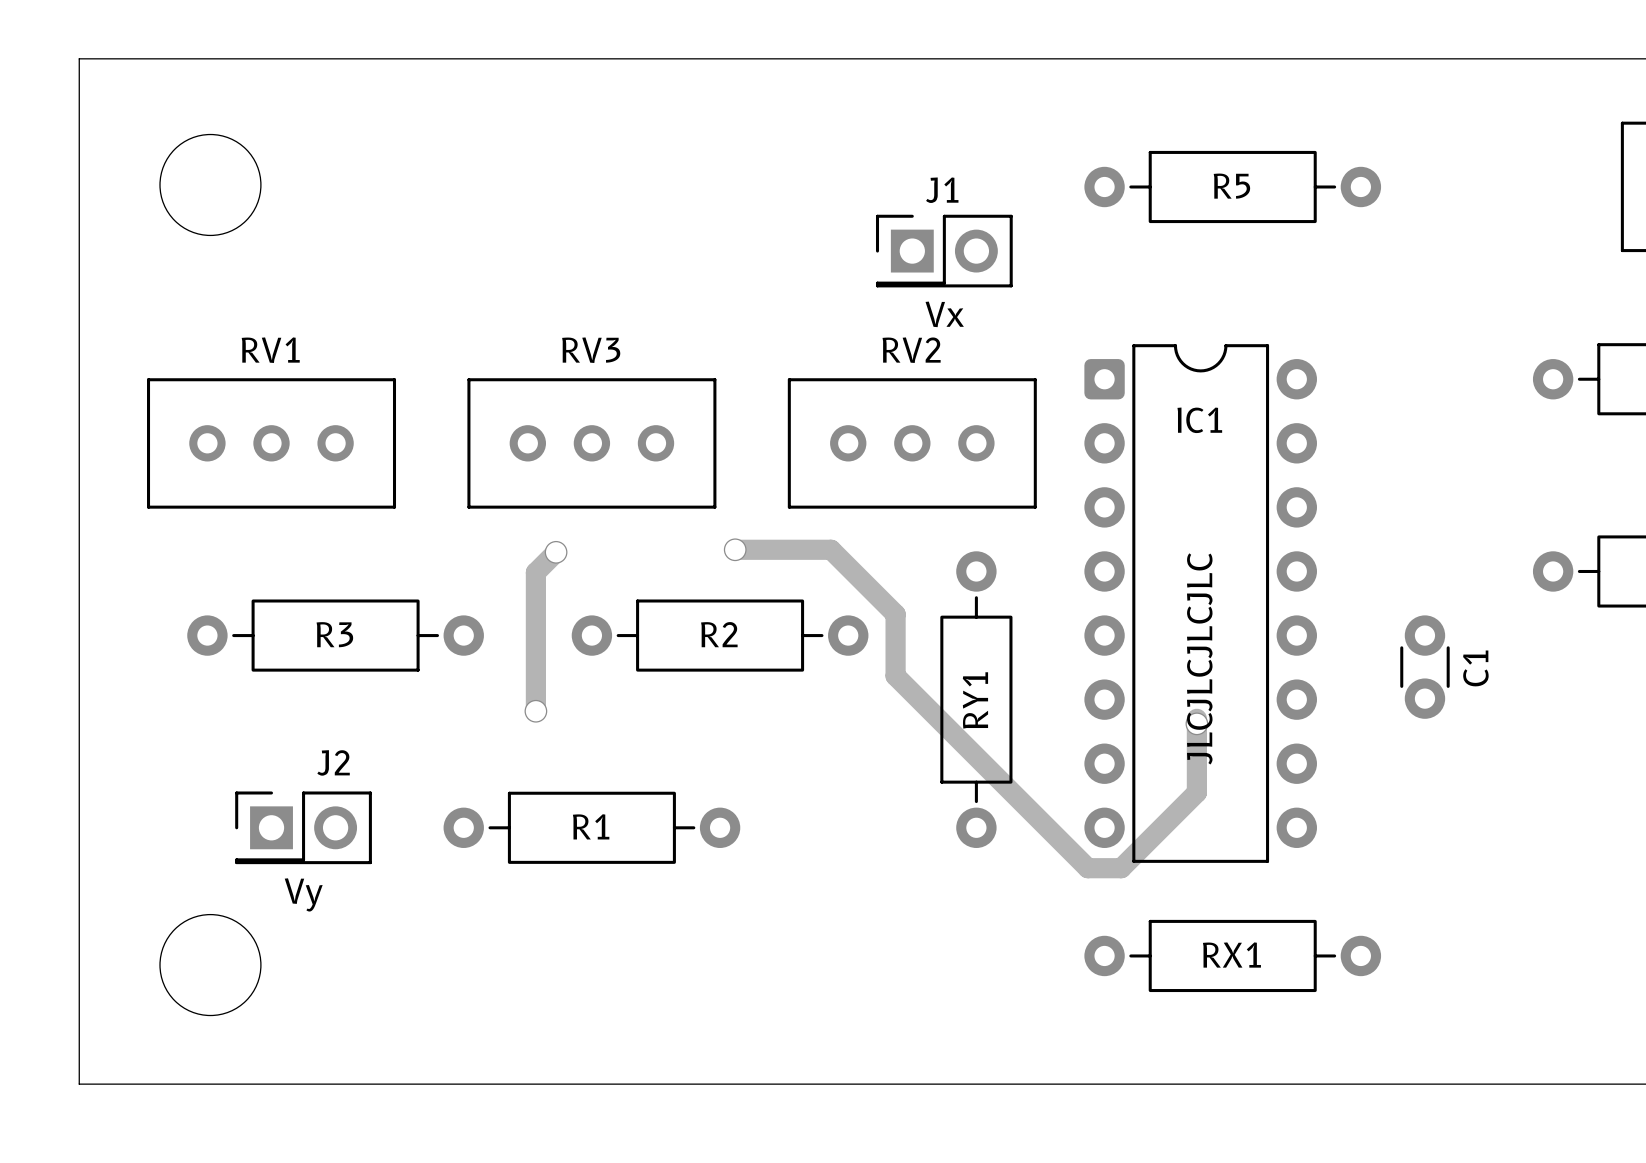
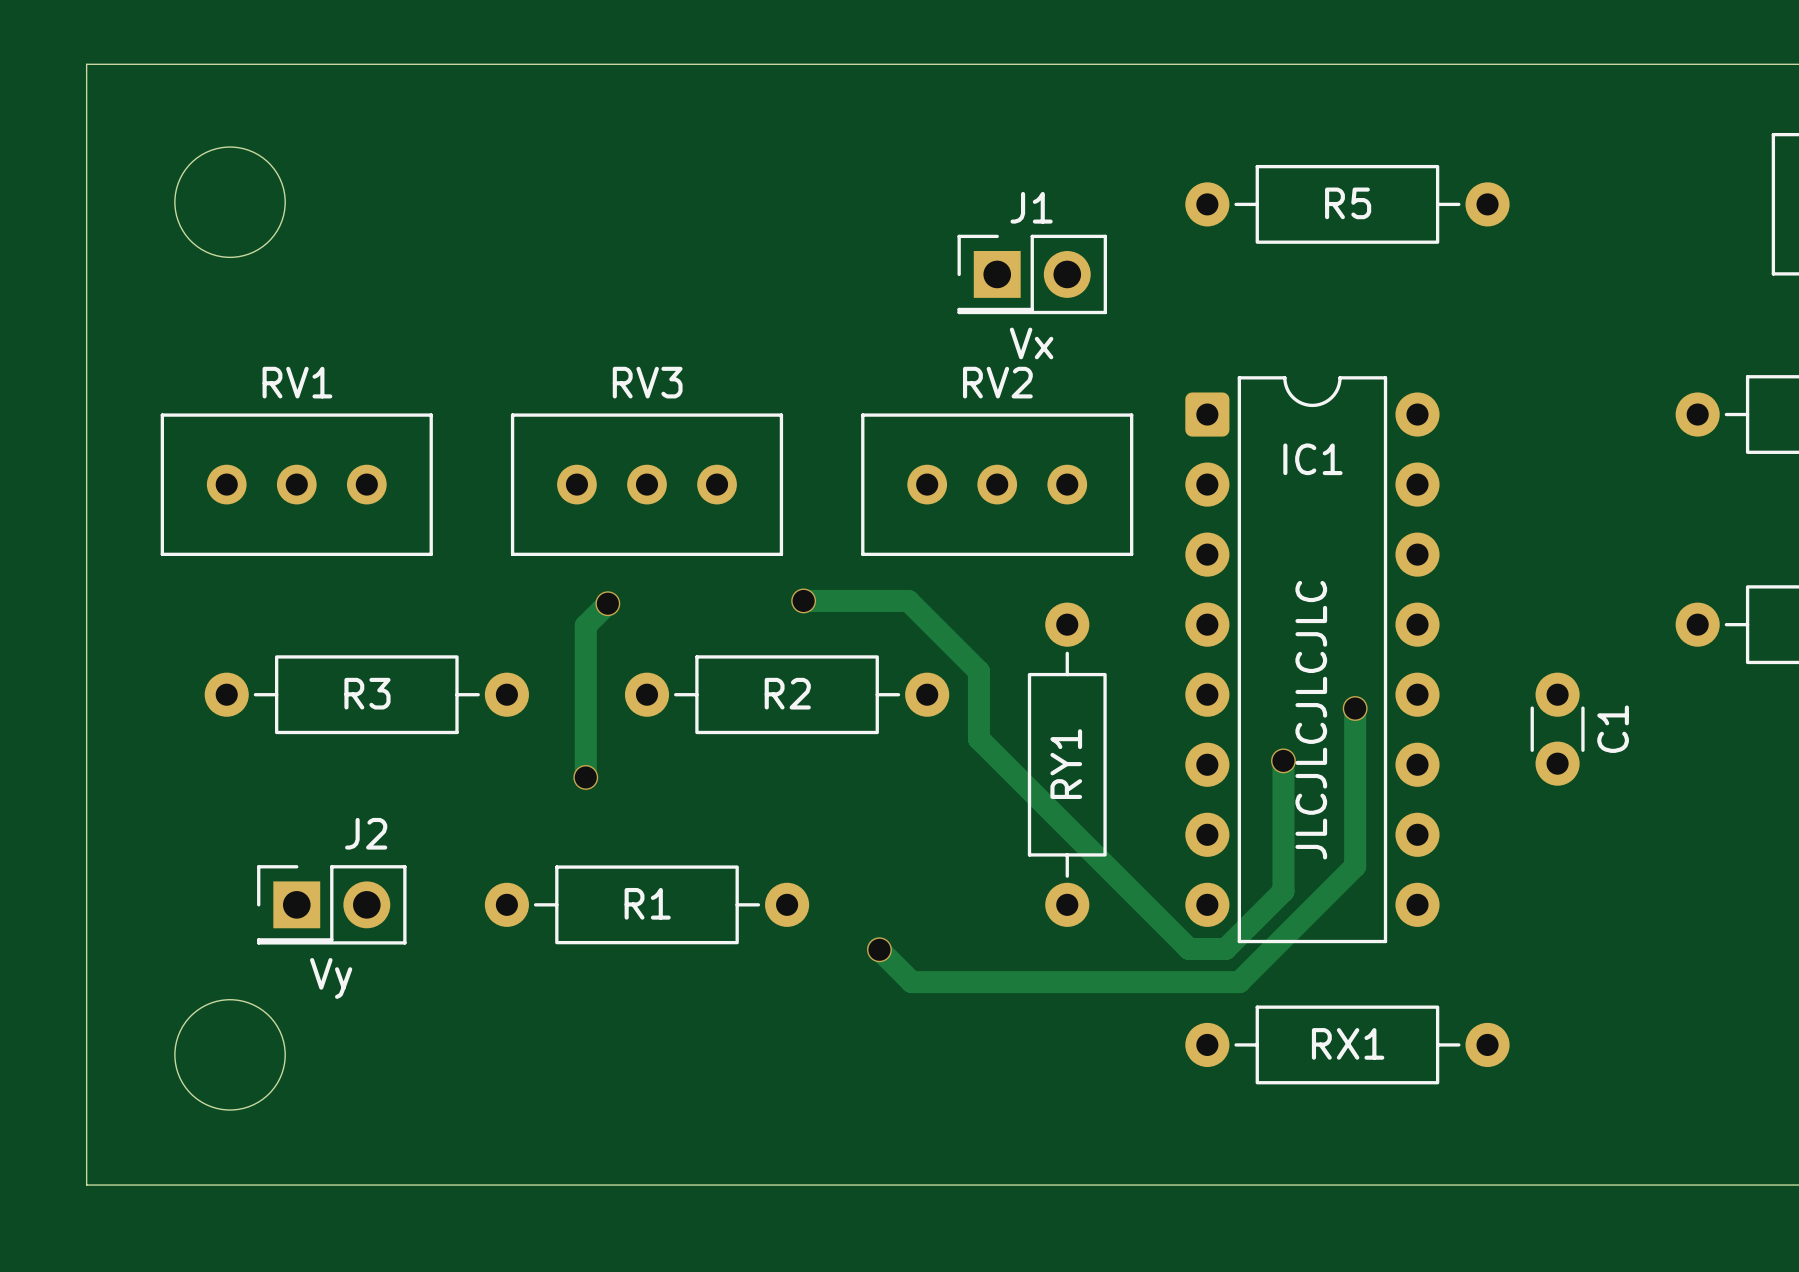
track: none -> (1355, 708) (1355, 866) (1239, 982) (911, 982) (878, 948)
via: none -> (1355, 708)
track: (1196, 718) (1196, 792) (1174, 815) -> (1283, 760) (1283, 891)
via position: (1196, 723) -> (1283, 760)
via: none -> (879, 949)

